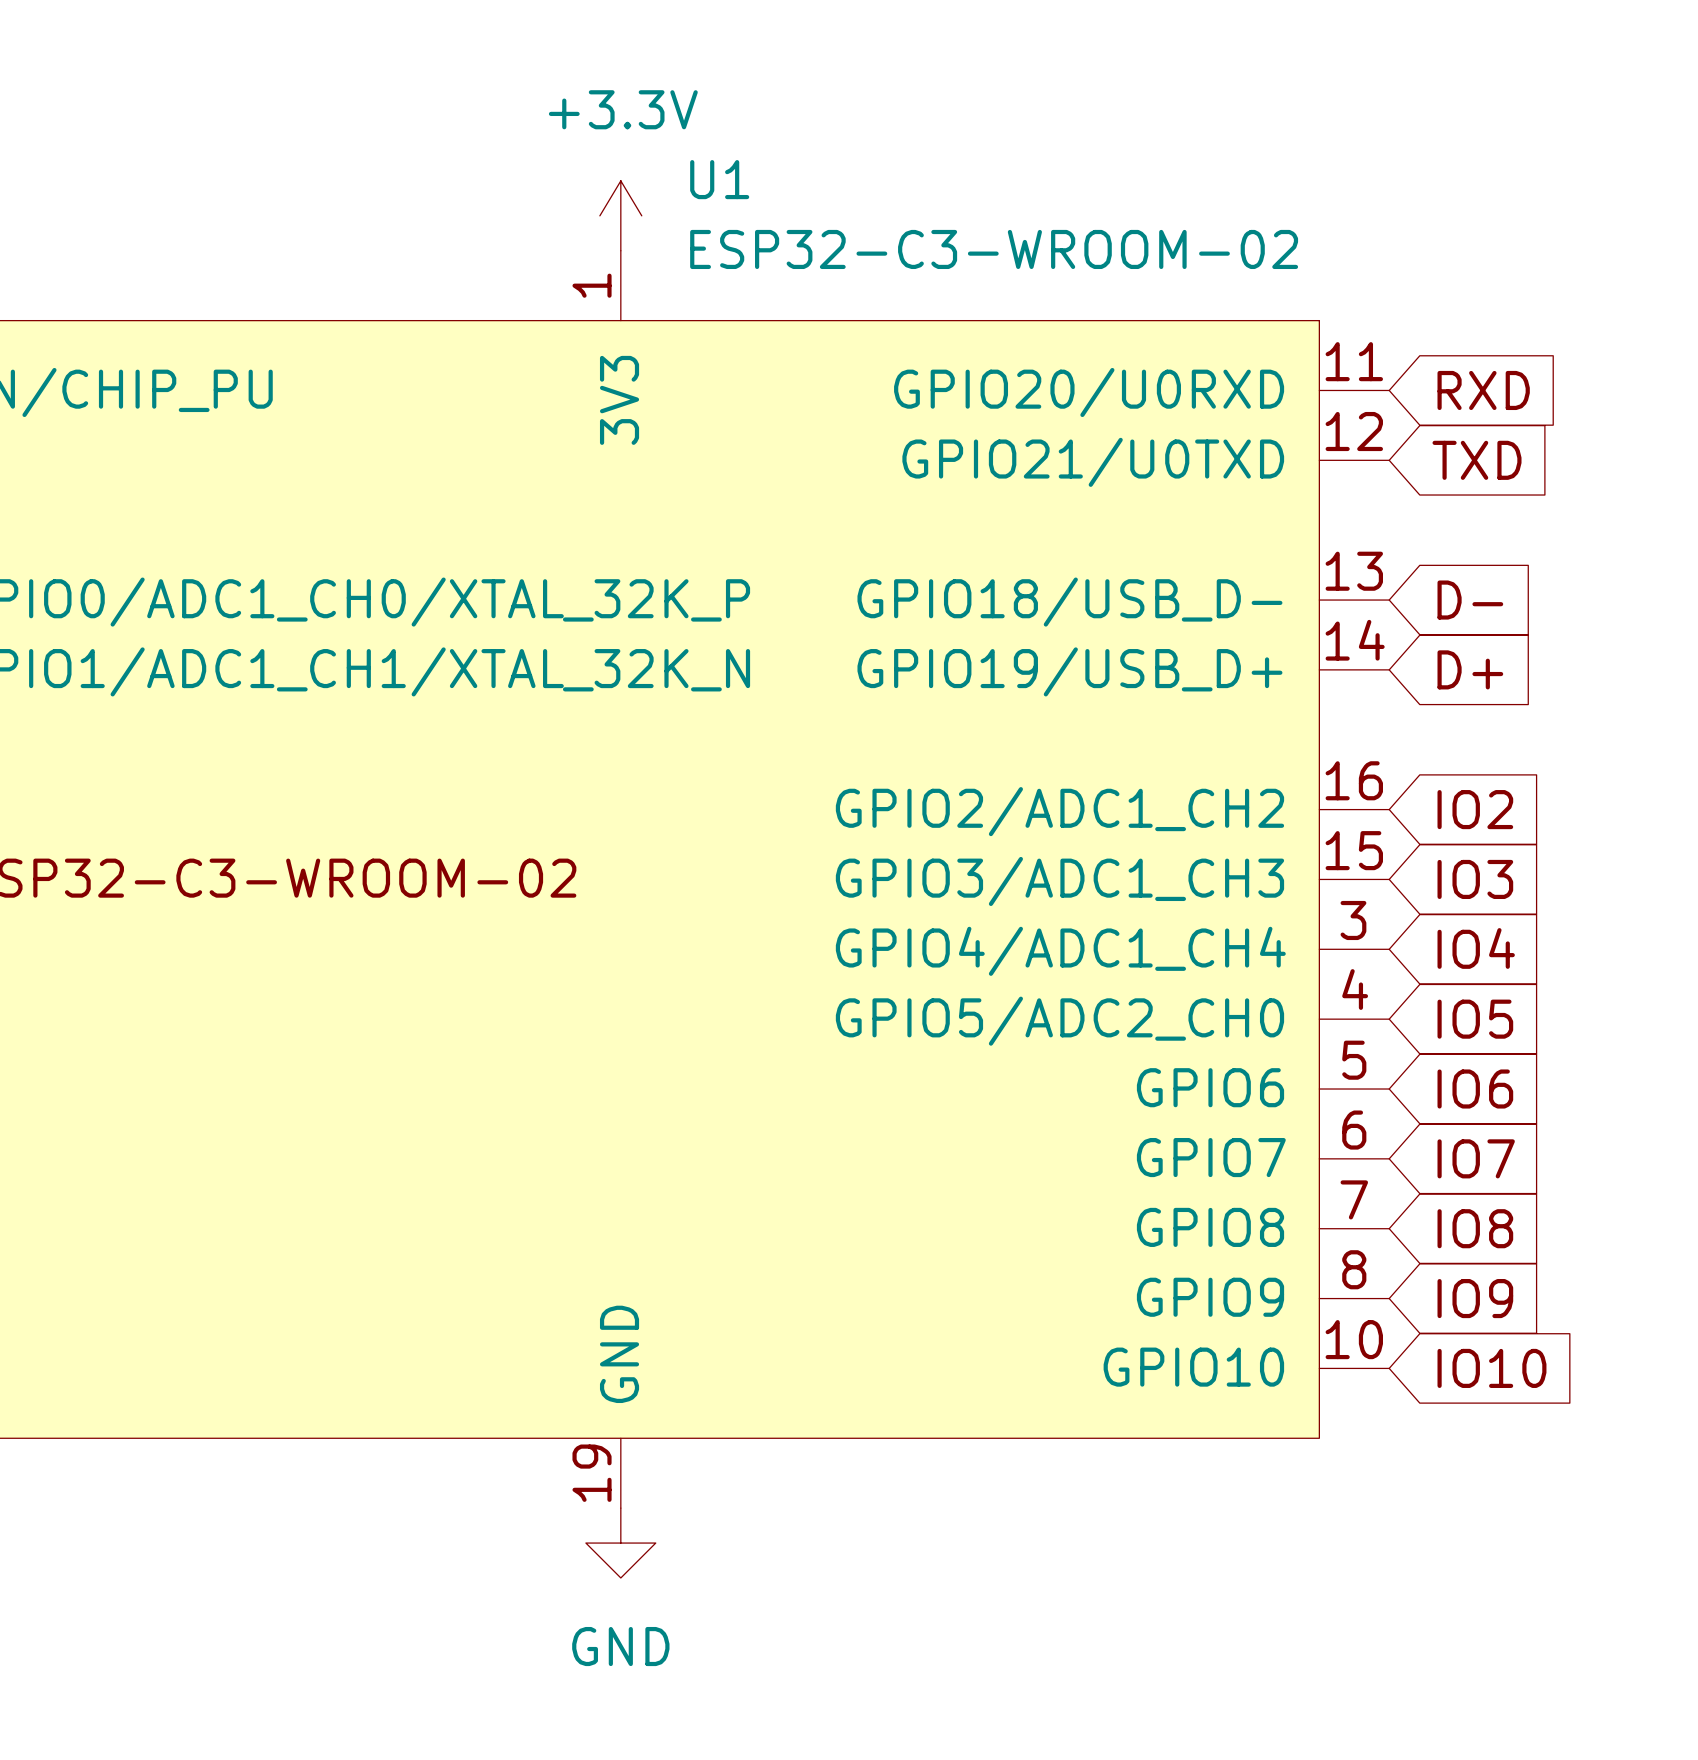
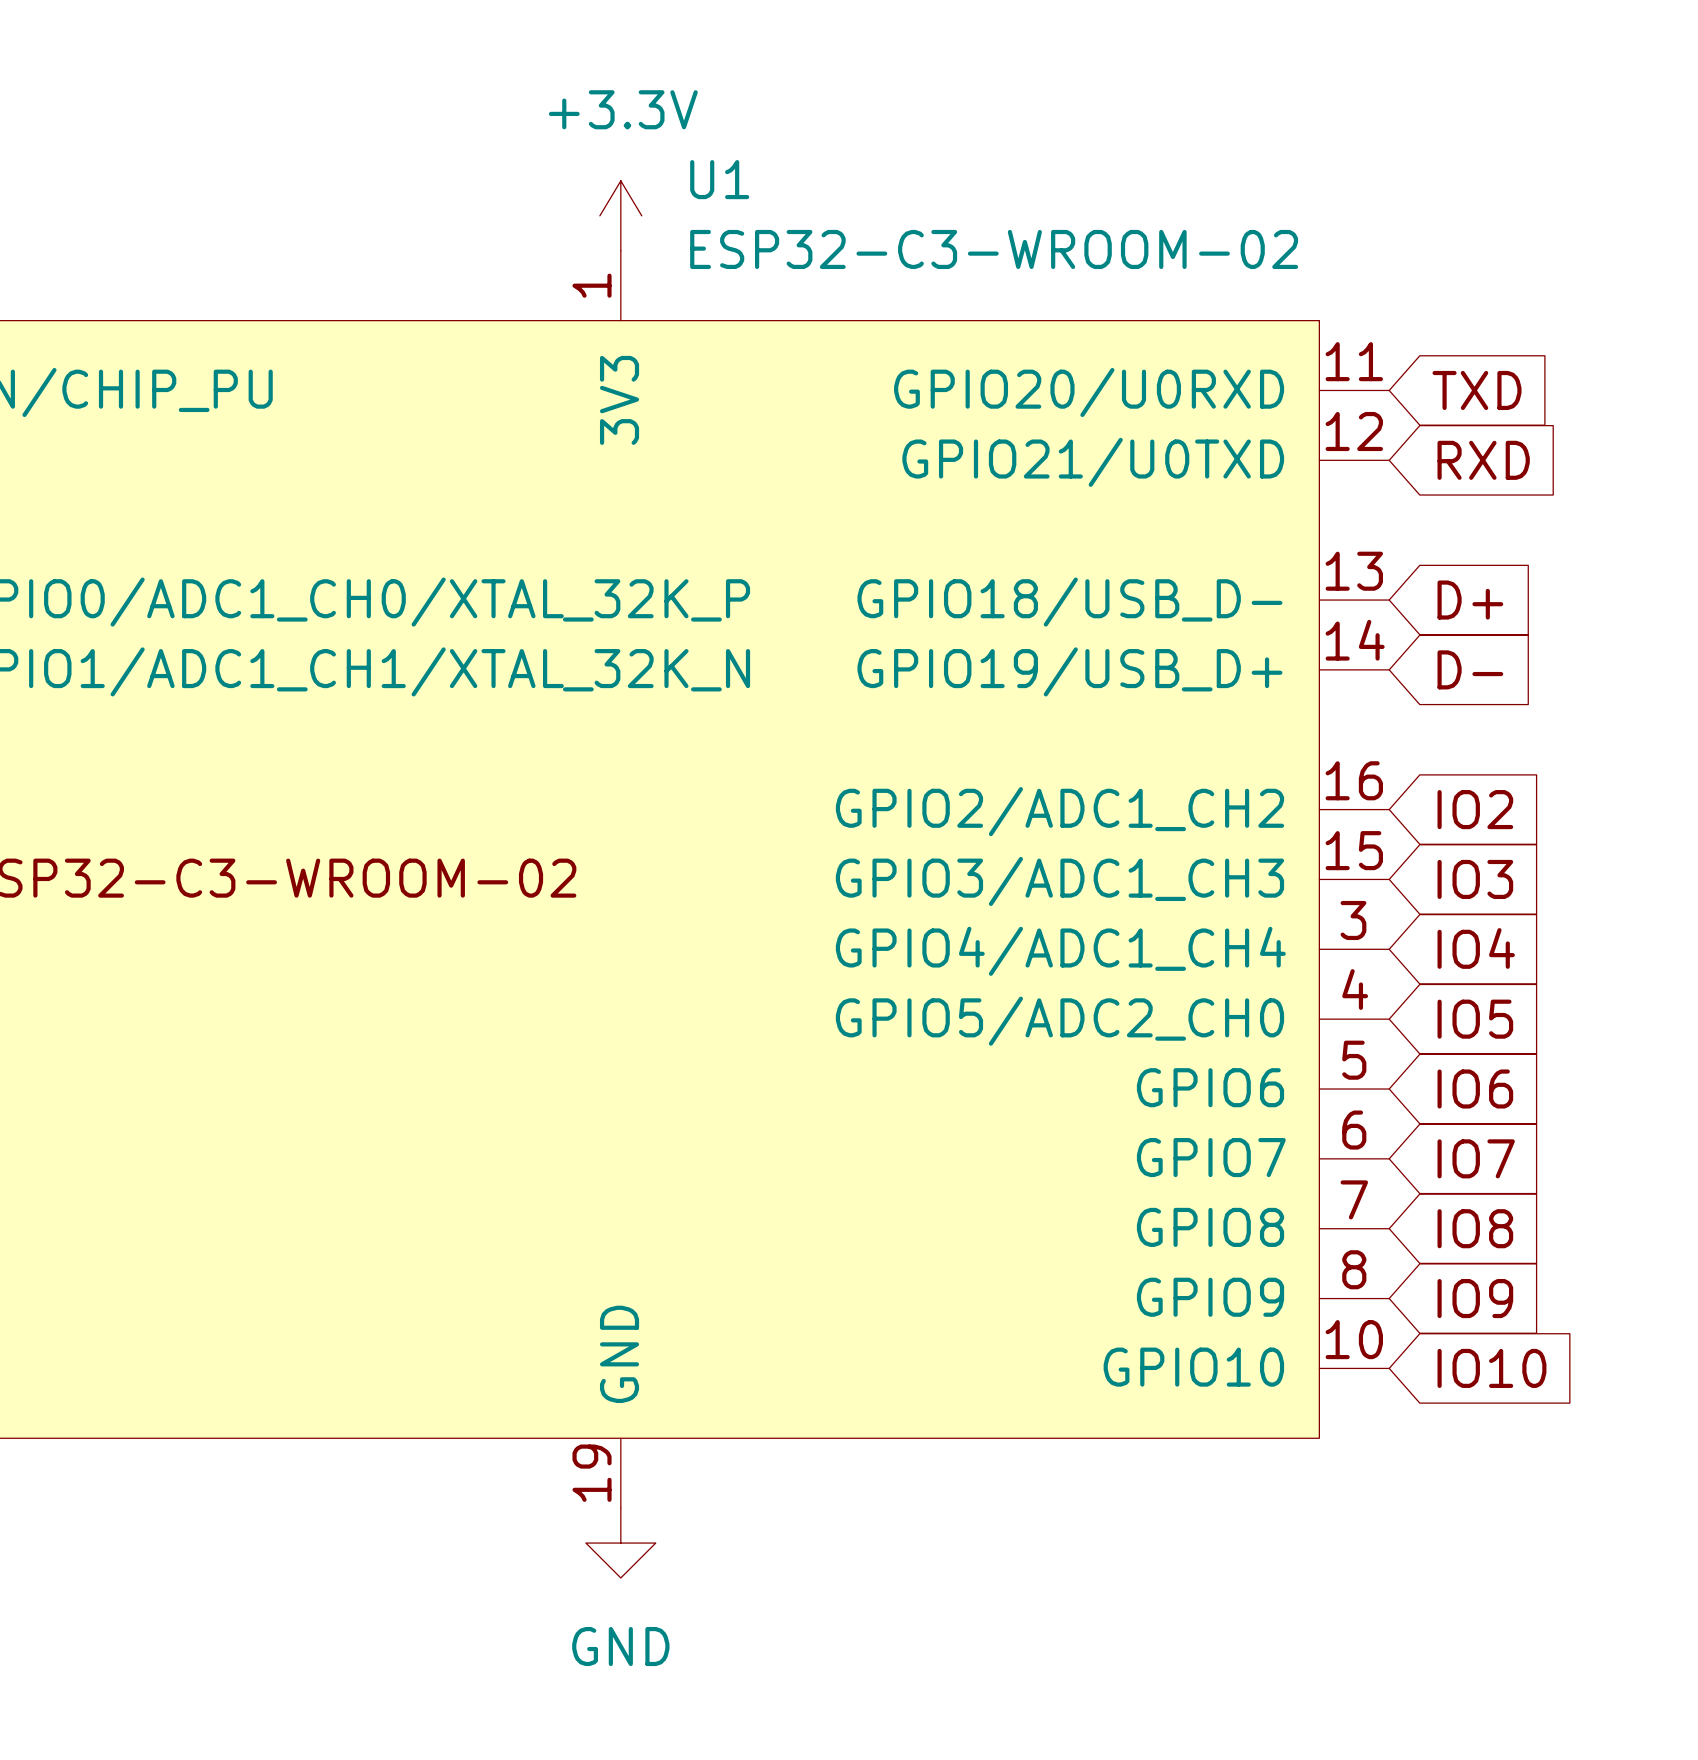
global label: RXD (1483, 390) -> TXD (1477, 390)
global label: TXD (1477, 460) -> RXD (1483, 460)
global label: D- (1470, 600) -> D+ (1470, 600)
global label: D+ (1470, 669) -> D- (1470, 669)

